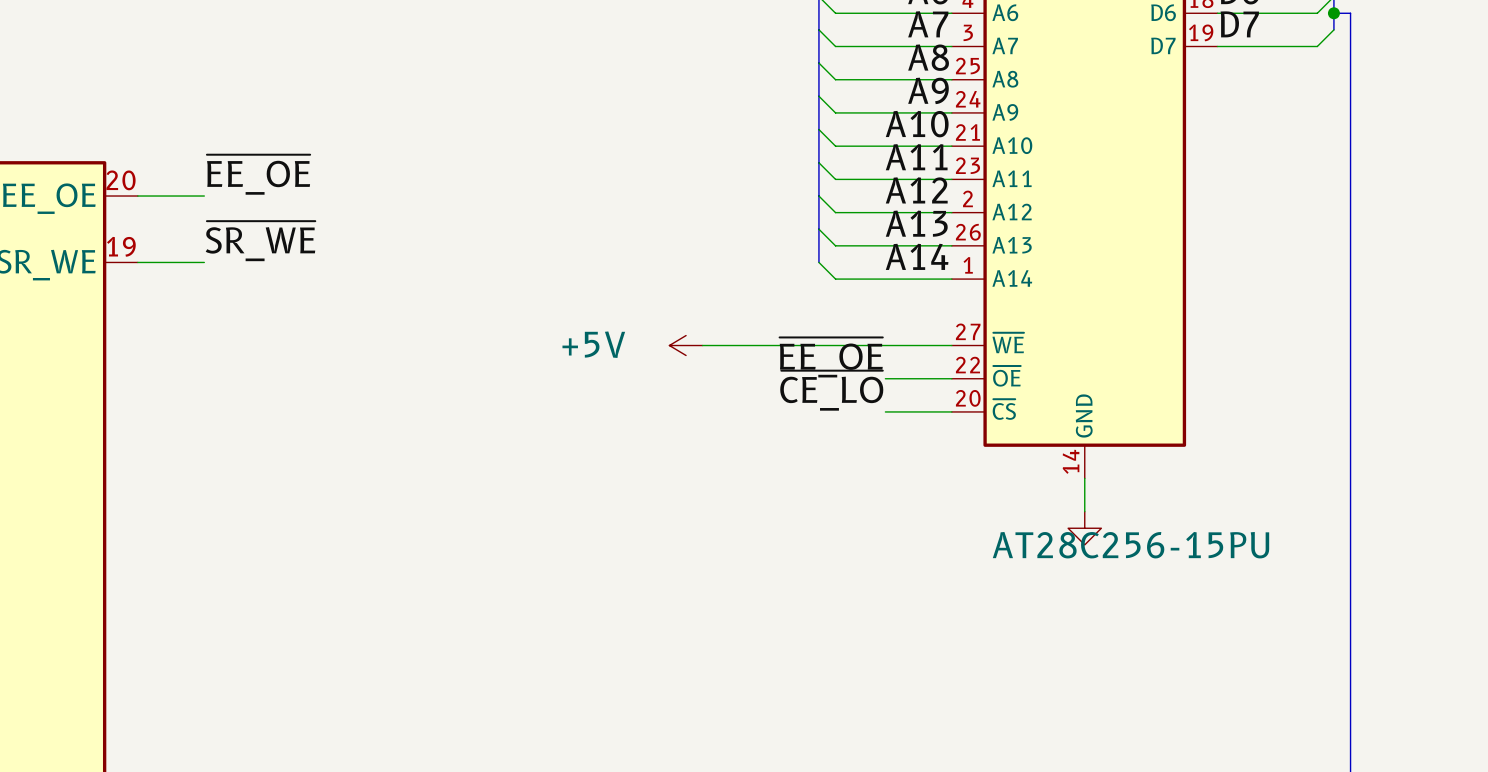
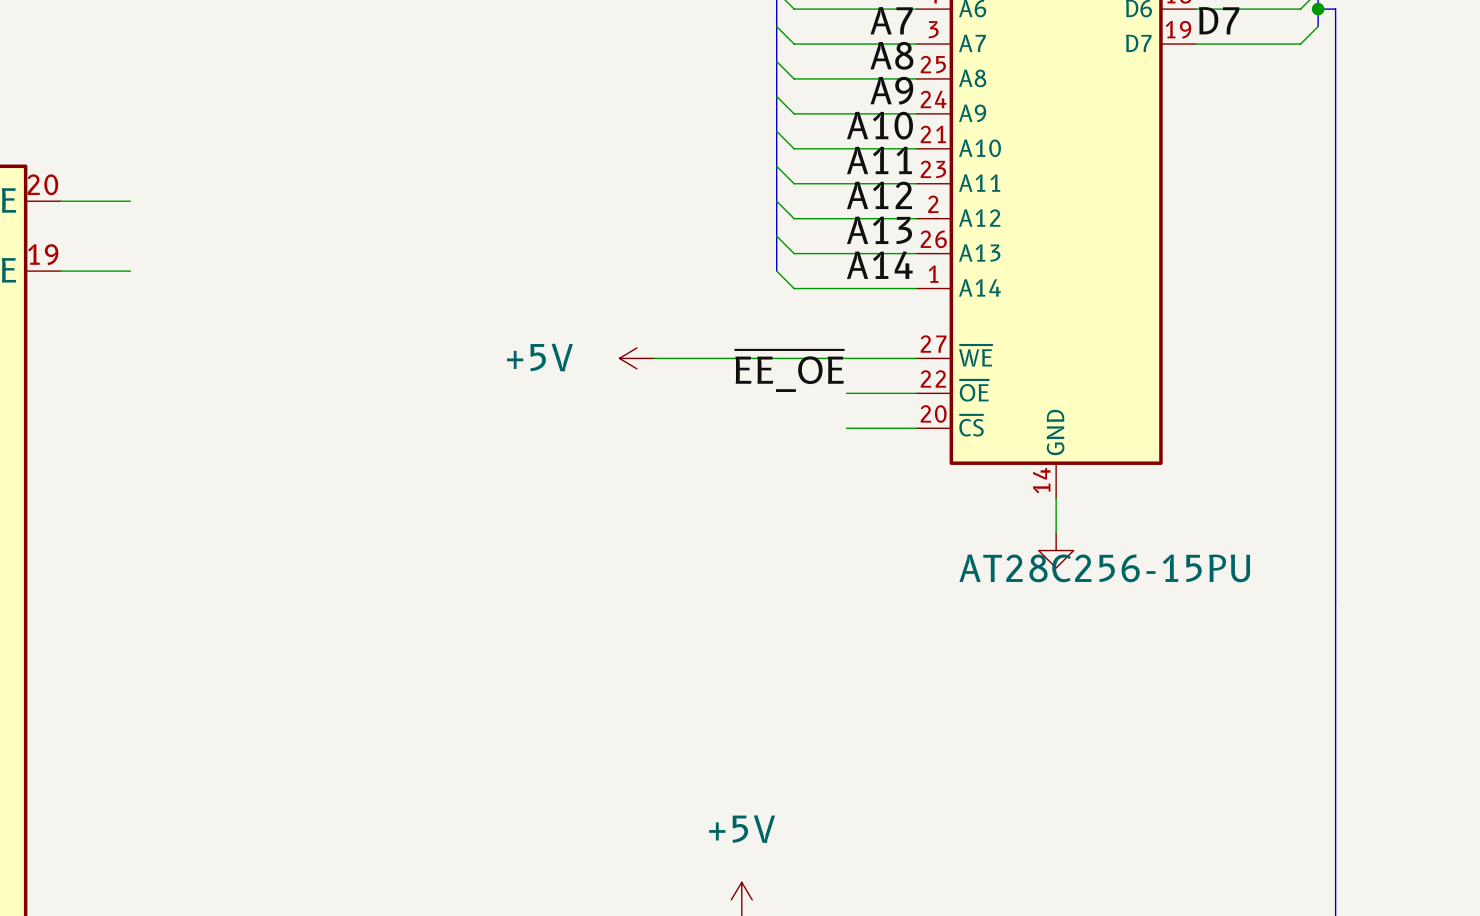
label: ~{EE_OE} (258, 174) -> none
label: ~{SR_WE} (260, 241) -> none
label: ~{CE_LO} (831, 390) -> none

